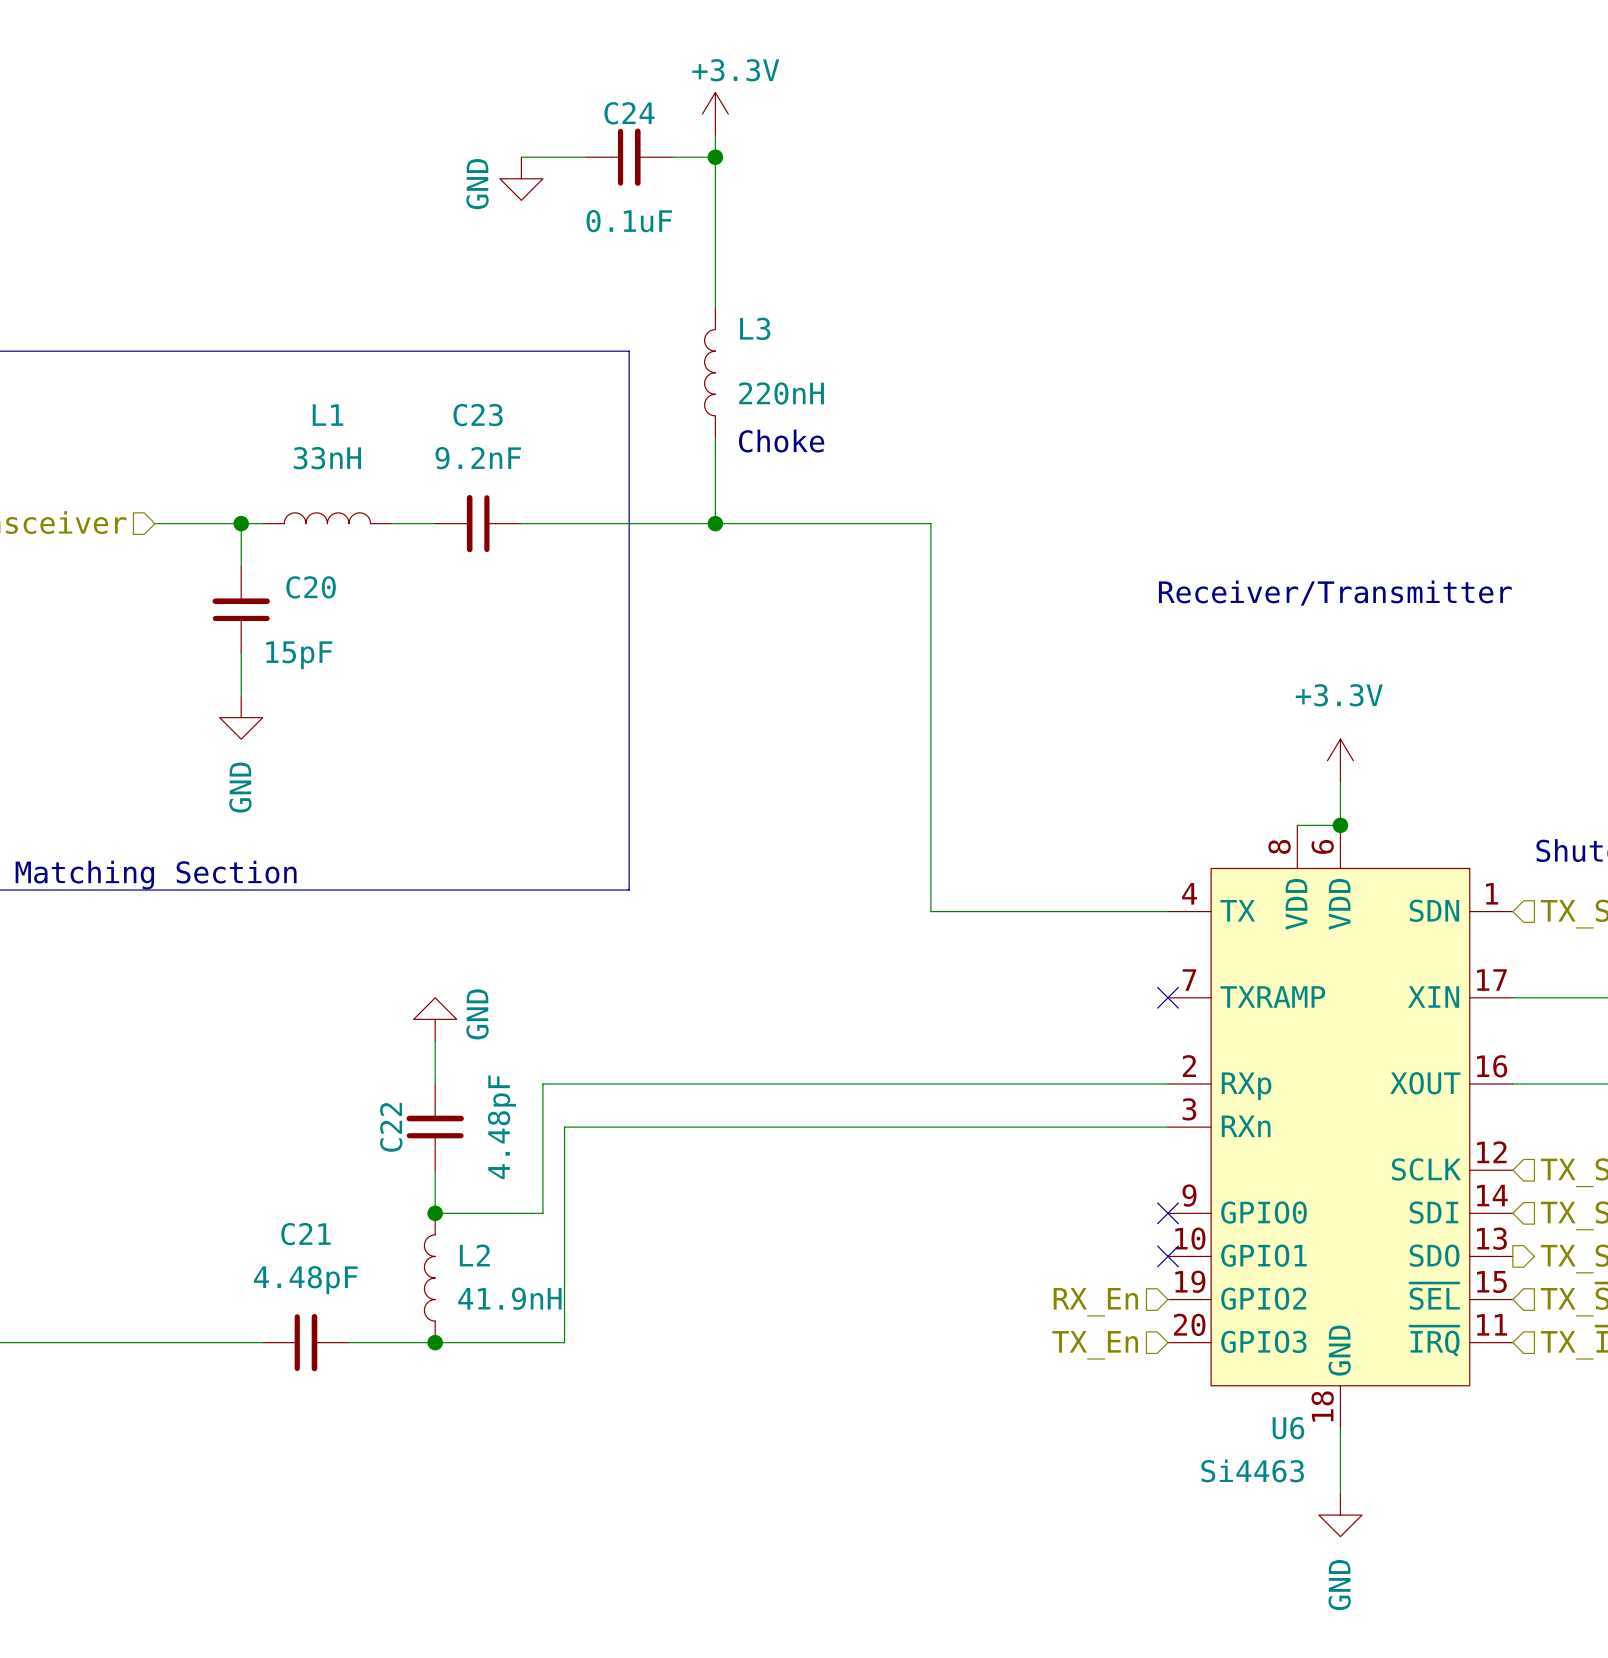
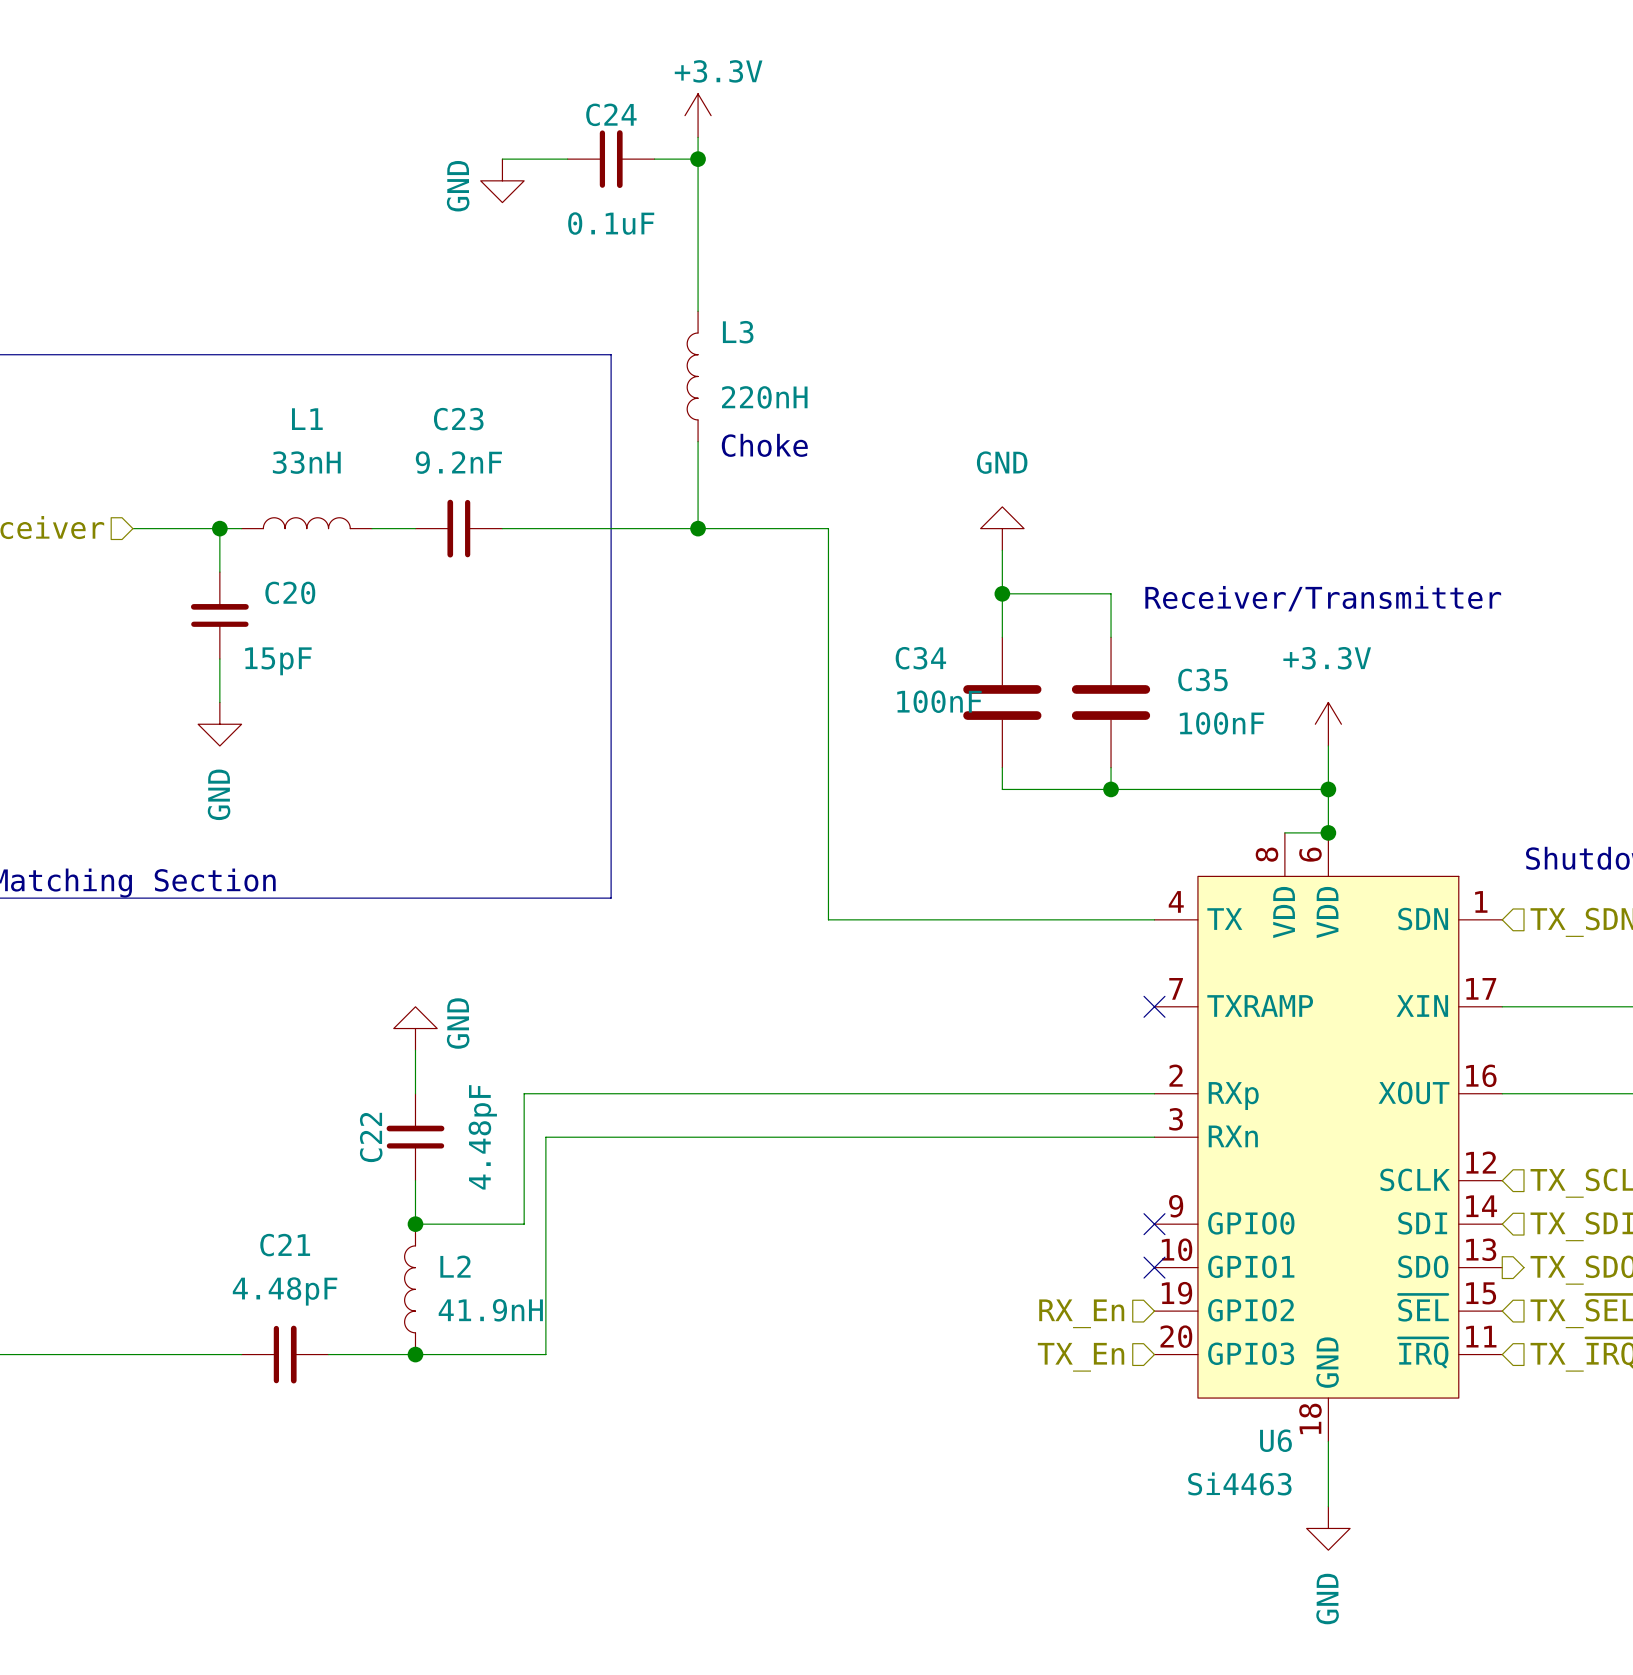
wire: (844, 523) (930, 523) (930, 911) -> (828, 528) (828, 919) (915, 919)
power symbol: none -> GND (1002, 528)
wire: none -> (1002, 550) (1002, 637)
wire: none -> (1002, 593) (1111, 593) (1111, 637)
junction: none -> (1002, 593)
C34: none -> 100nF (1002, 702)
C35: none -> 100nF (1111, 702)
wire: none -> (1328, 745) (1328, 789) (1002, 789) (1002, 767)
wire: none -> (1111, 767) (1111, 789)
power symbol position: +3.3V (1340, 760) -> +3.3V (1328, 724)
junction: none -> (1111, 789)
junction: none -> (1328, 789)

